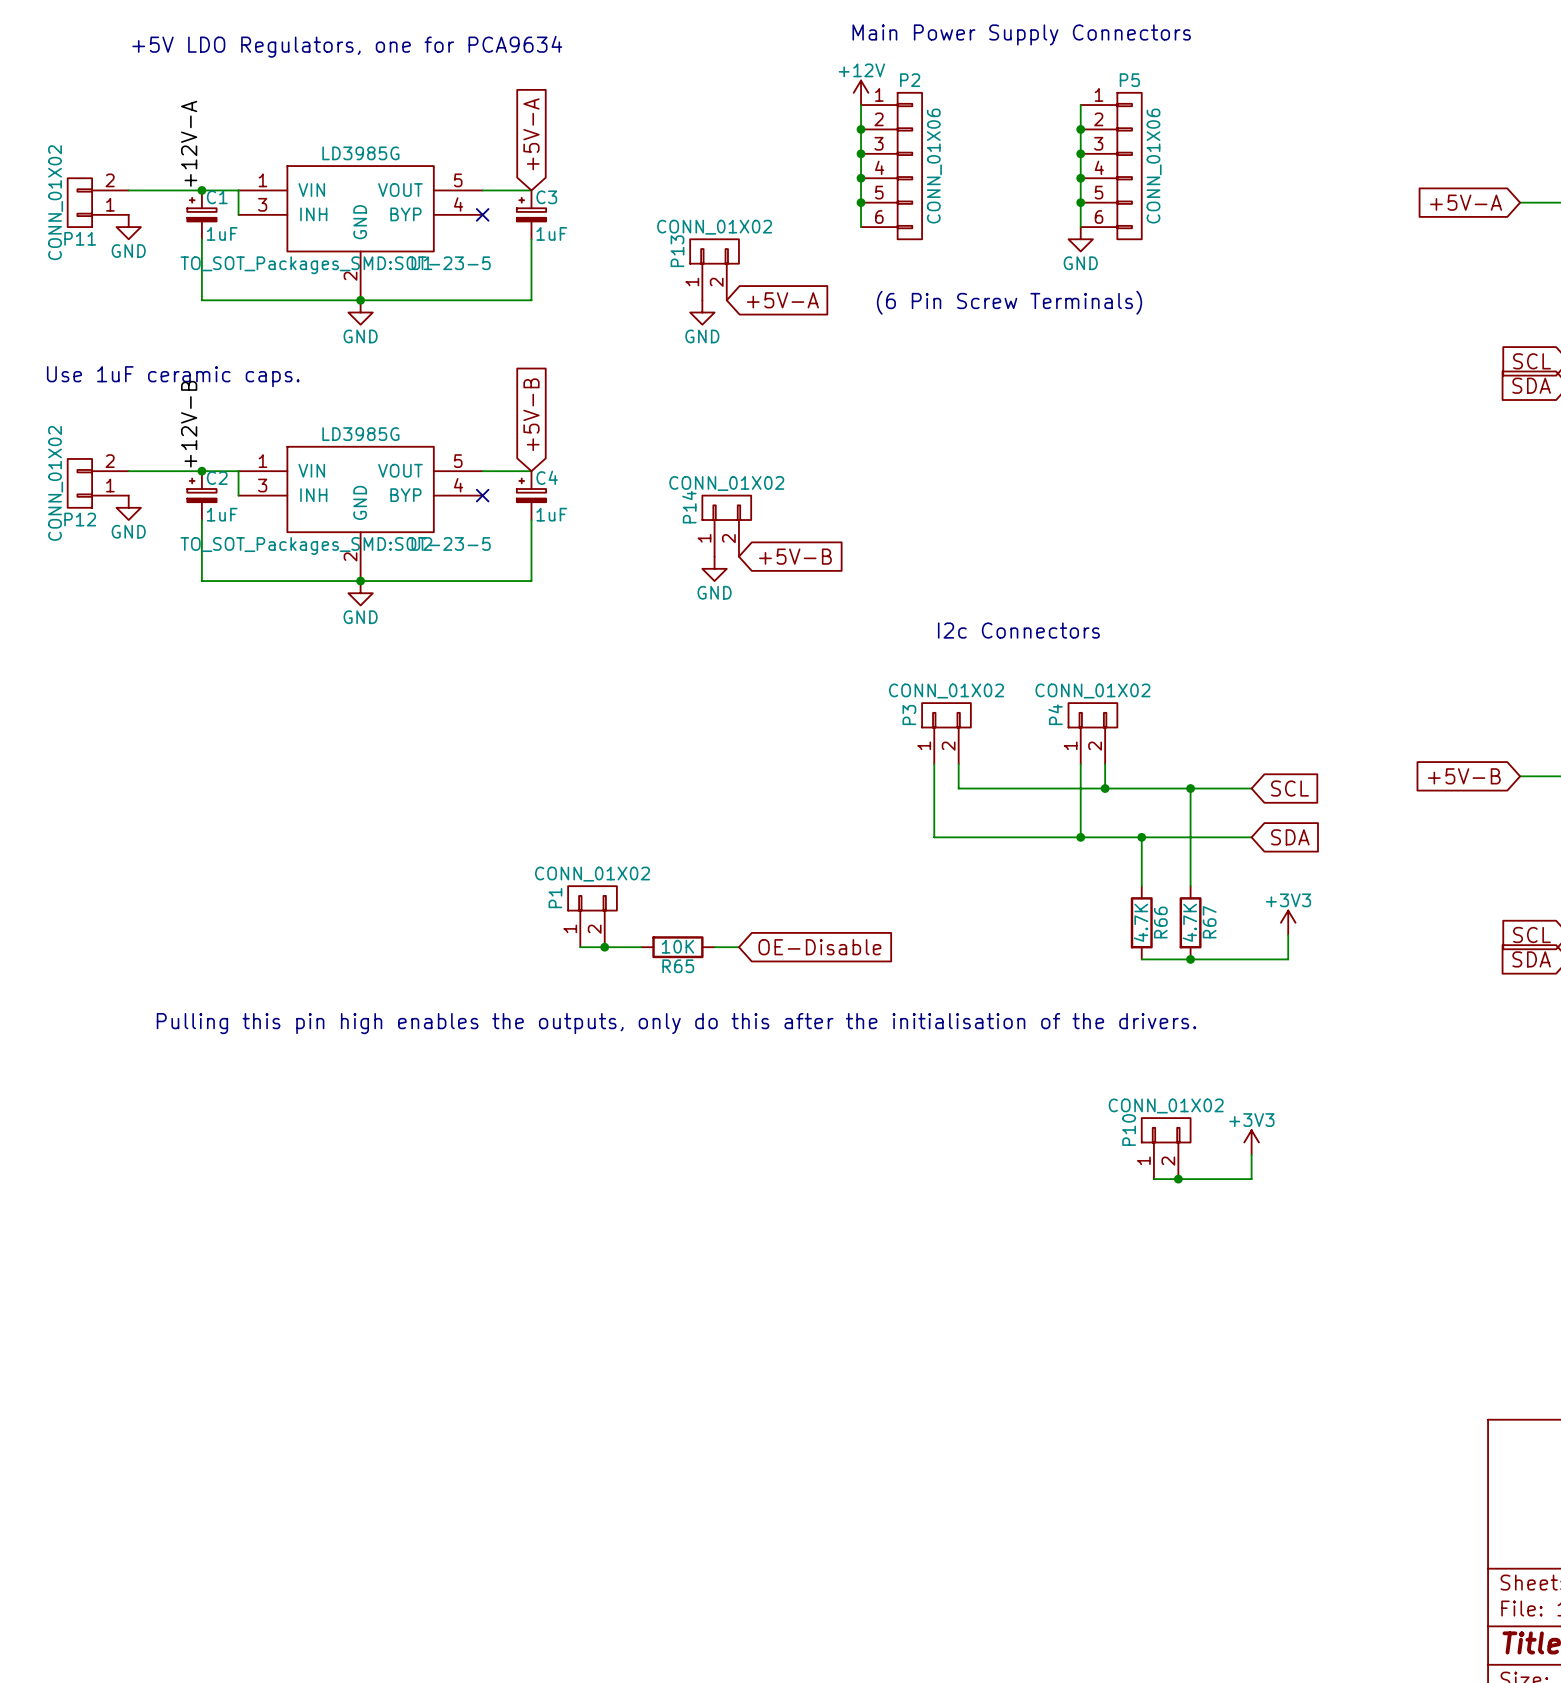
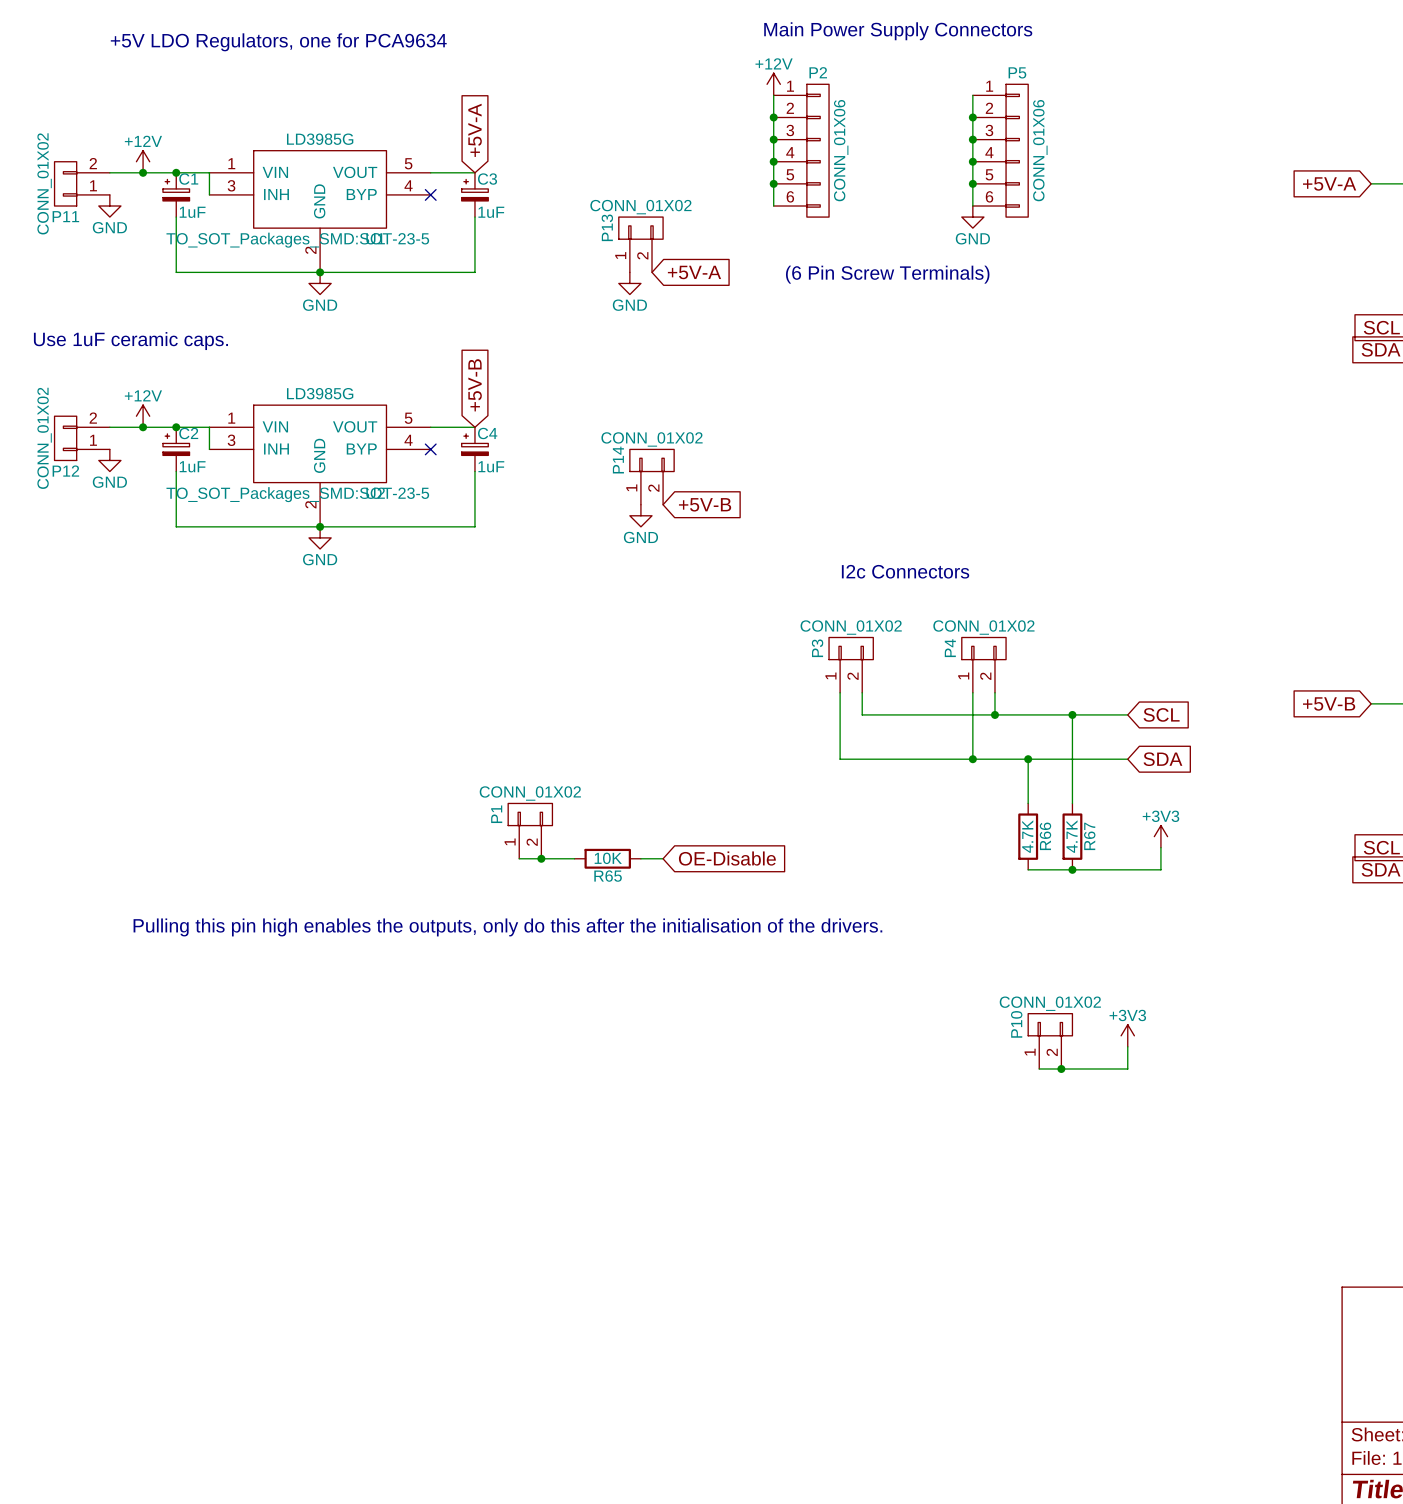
label: +12V-A (189, 143) -> none
power symbol: none -> +12V (143, 161)
junction: none -> (143, 172)
label: +12V-B (189, 424) -> none
power symbol: none -> +12V (143, 416)
junction: none -> (143, 427)

